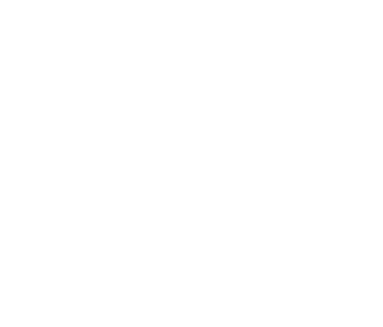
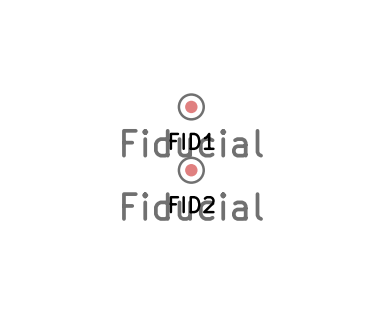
FID1: none -> Fiducial (191, 106)
FID2: none -> Fiducial (191, 170)

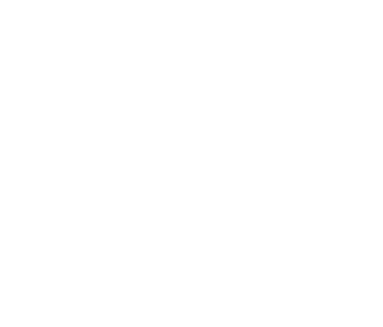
FID1: Fiducial (191, 106) -> none
FID2: Fiducial (191, 170) -> none

